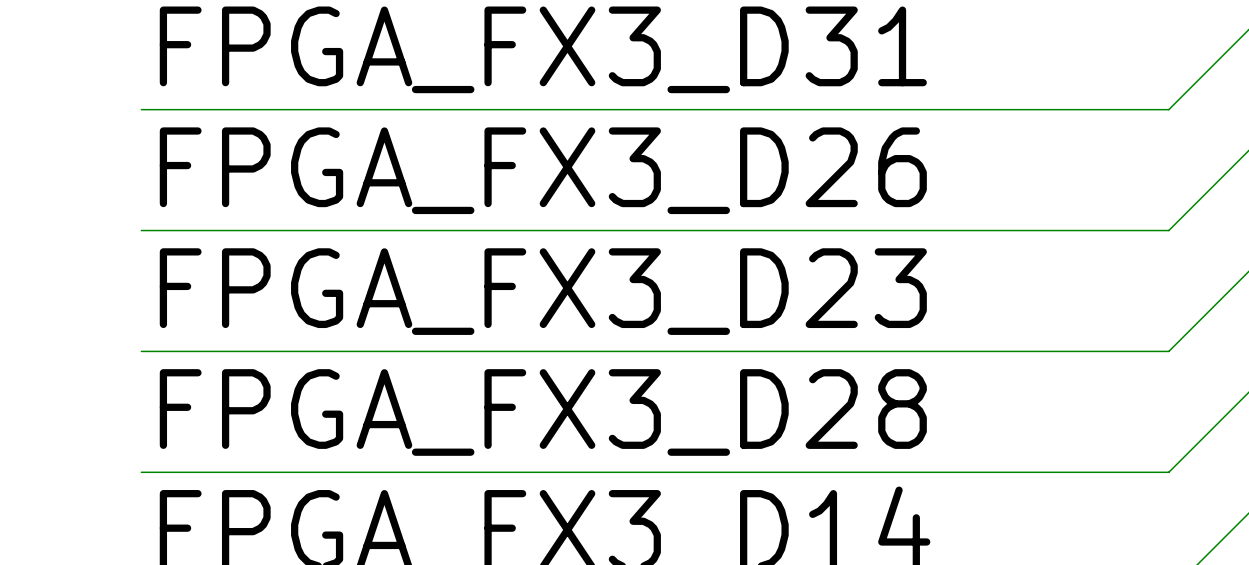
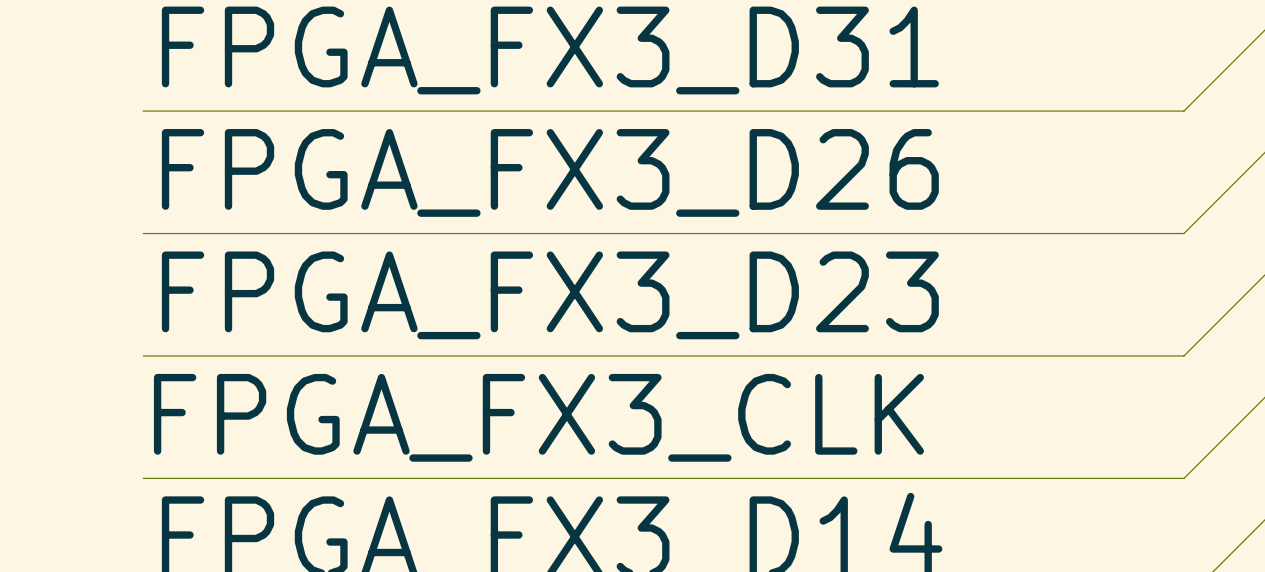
label: FPGA_FX3_D28 (543, 412) -> FPGA_FX3_CLK (538, 417)

